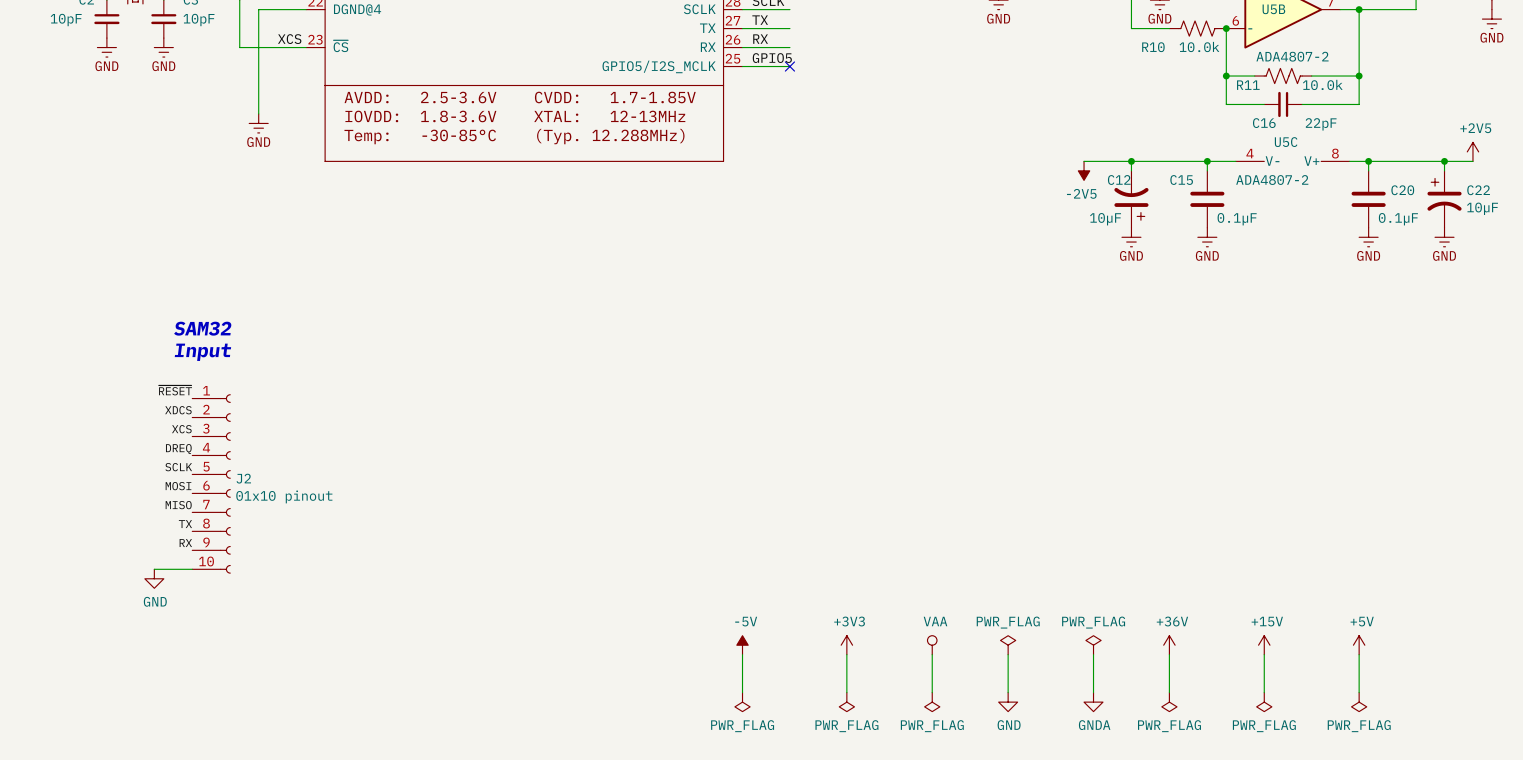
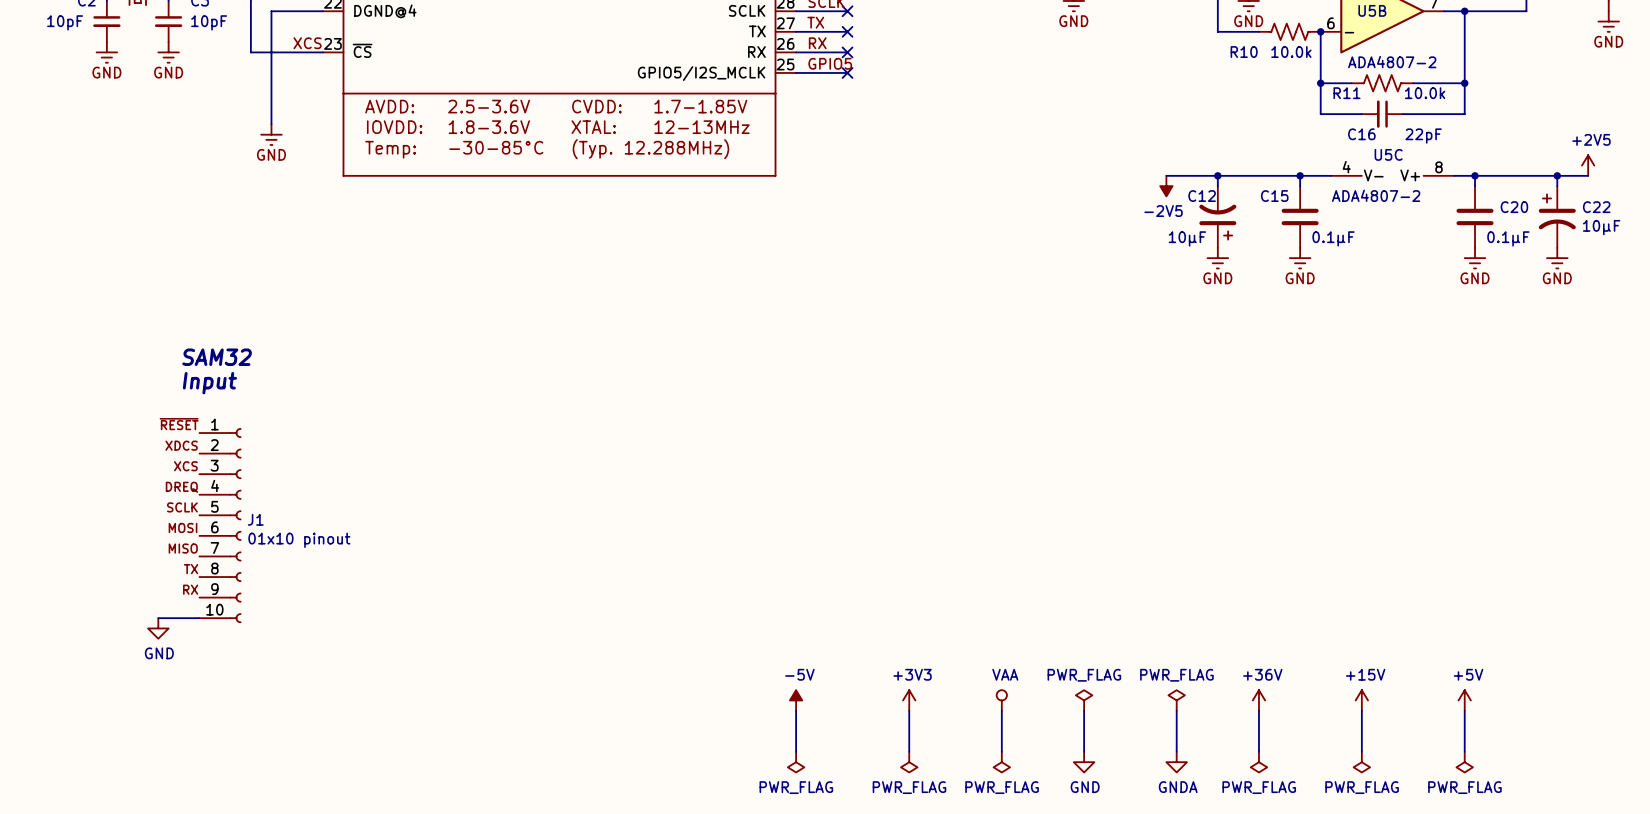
no-connect mark: none -> (847, 11)
no-connect mark: none -> (847, 31)
no-connect mark: none -> (847, 52)
J2 name: J2 (243, 478) -> J1 (255, 519)

